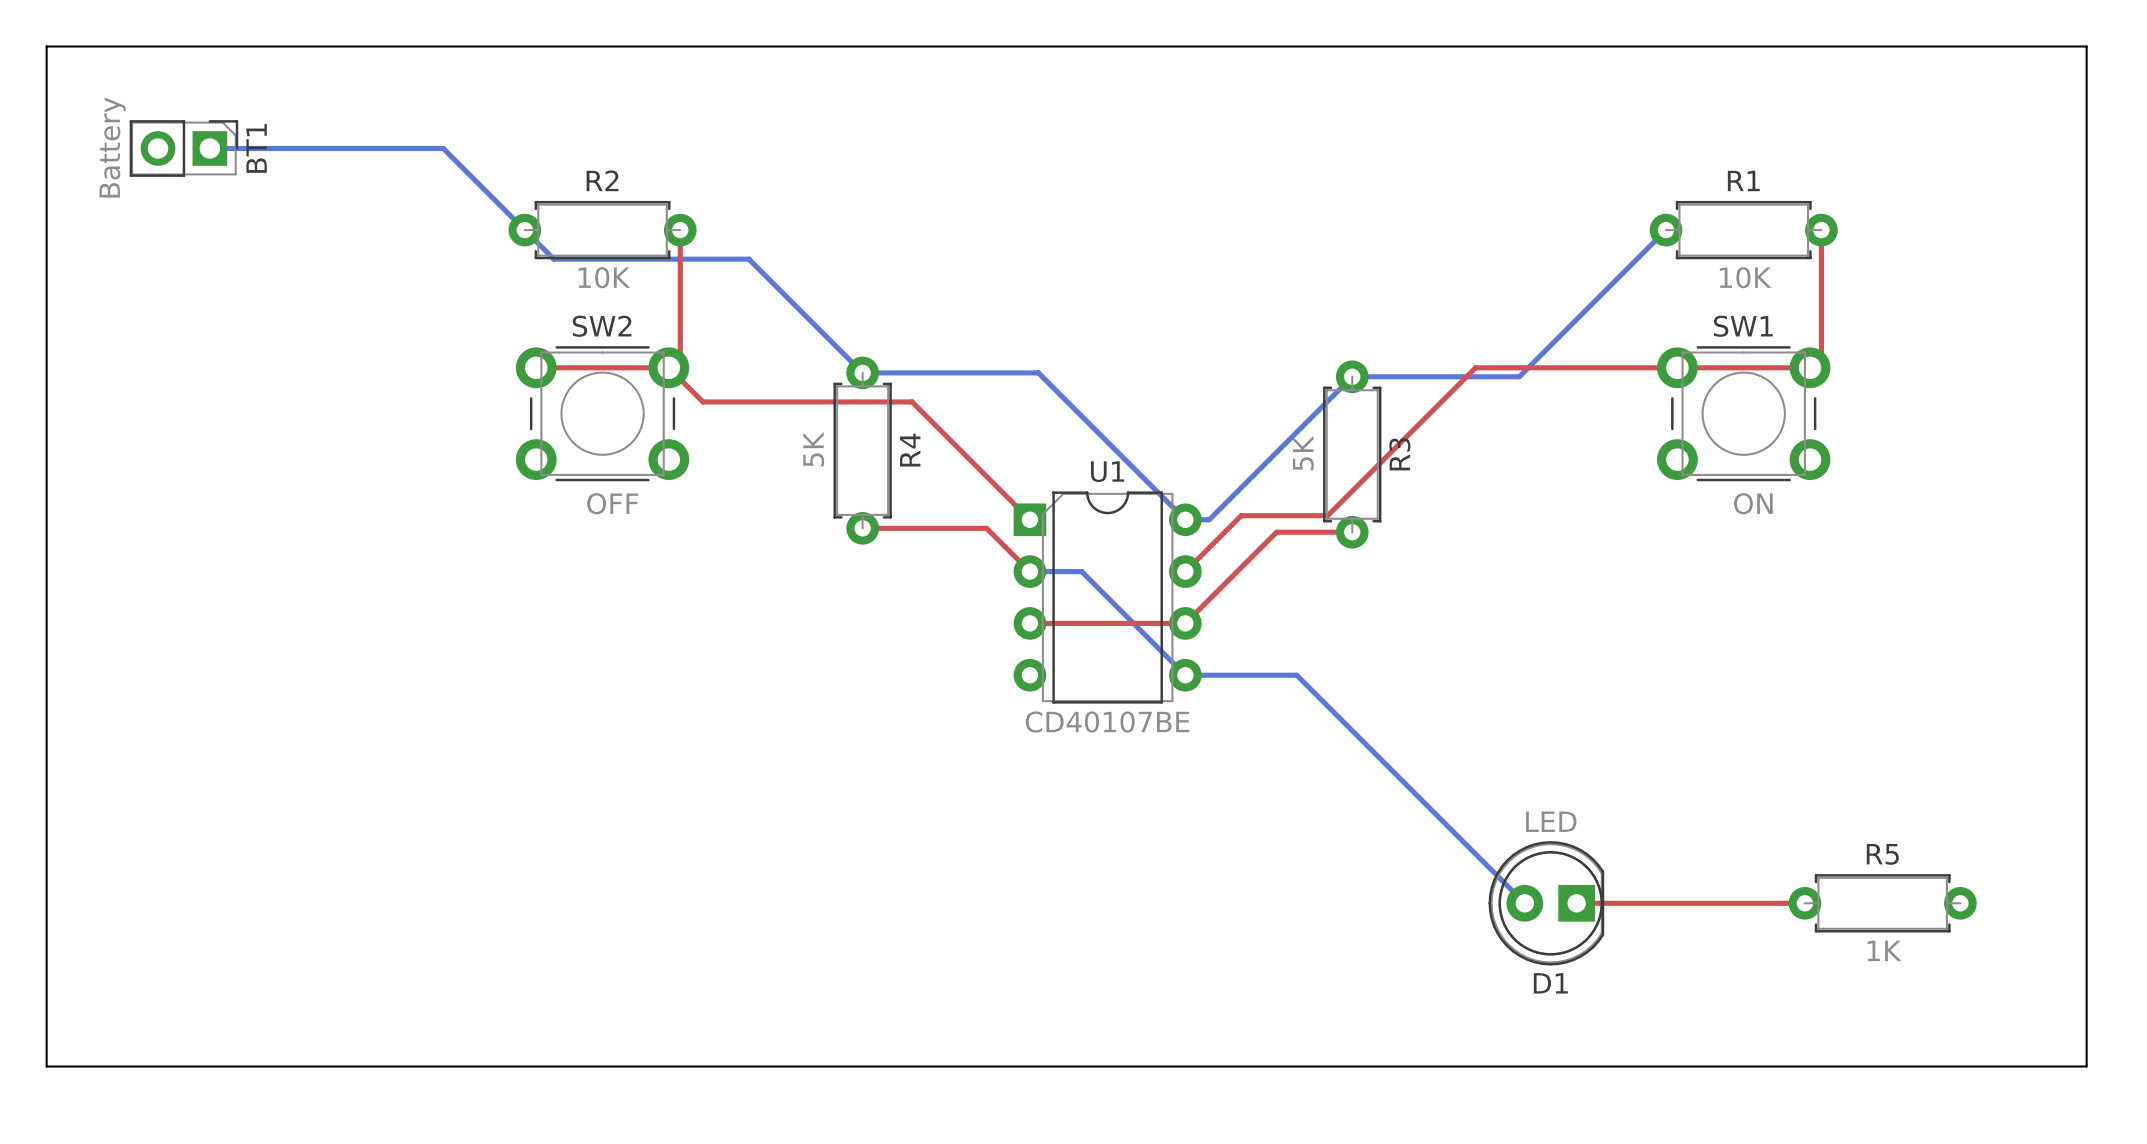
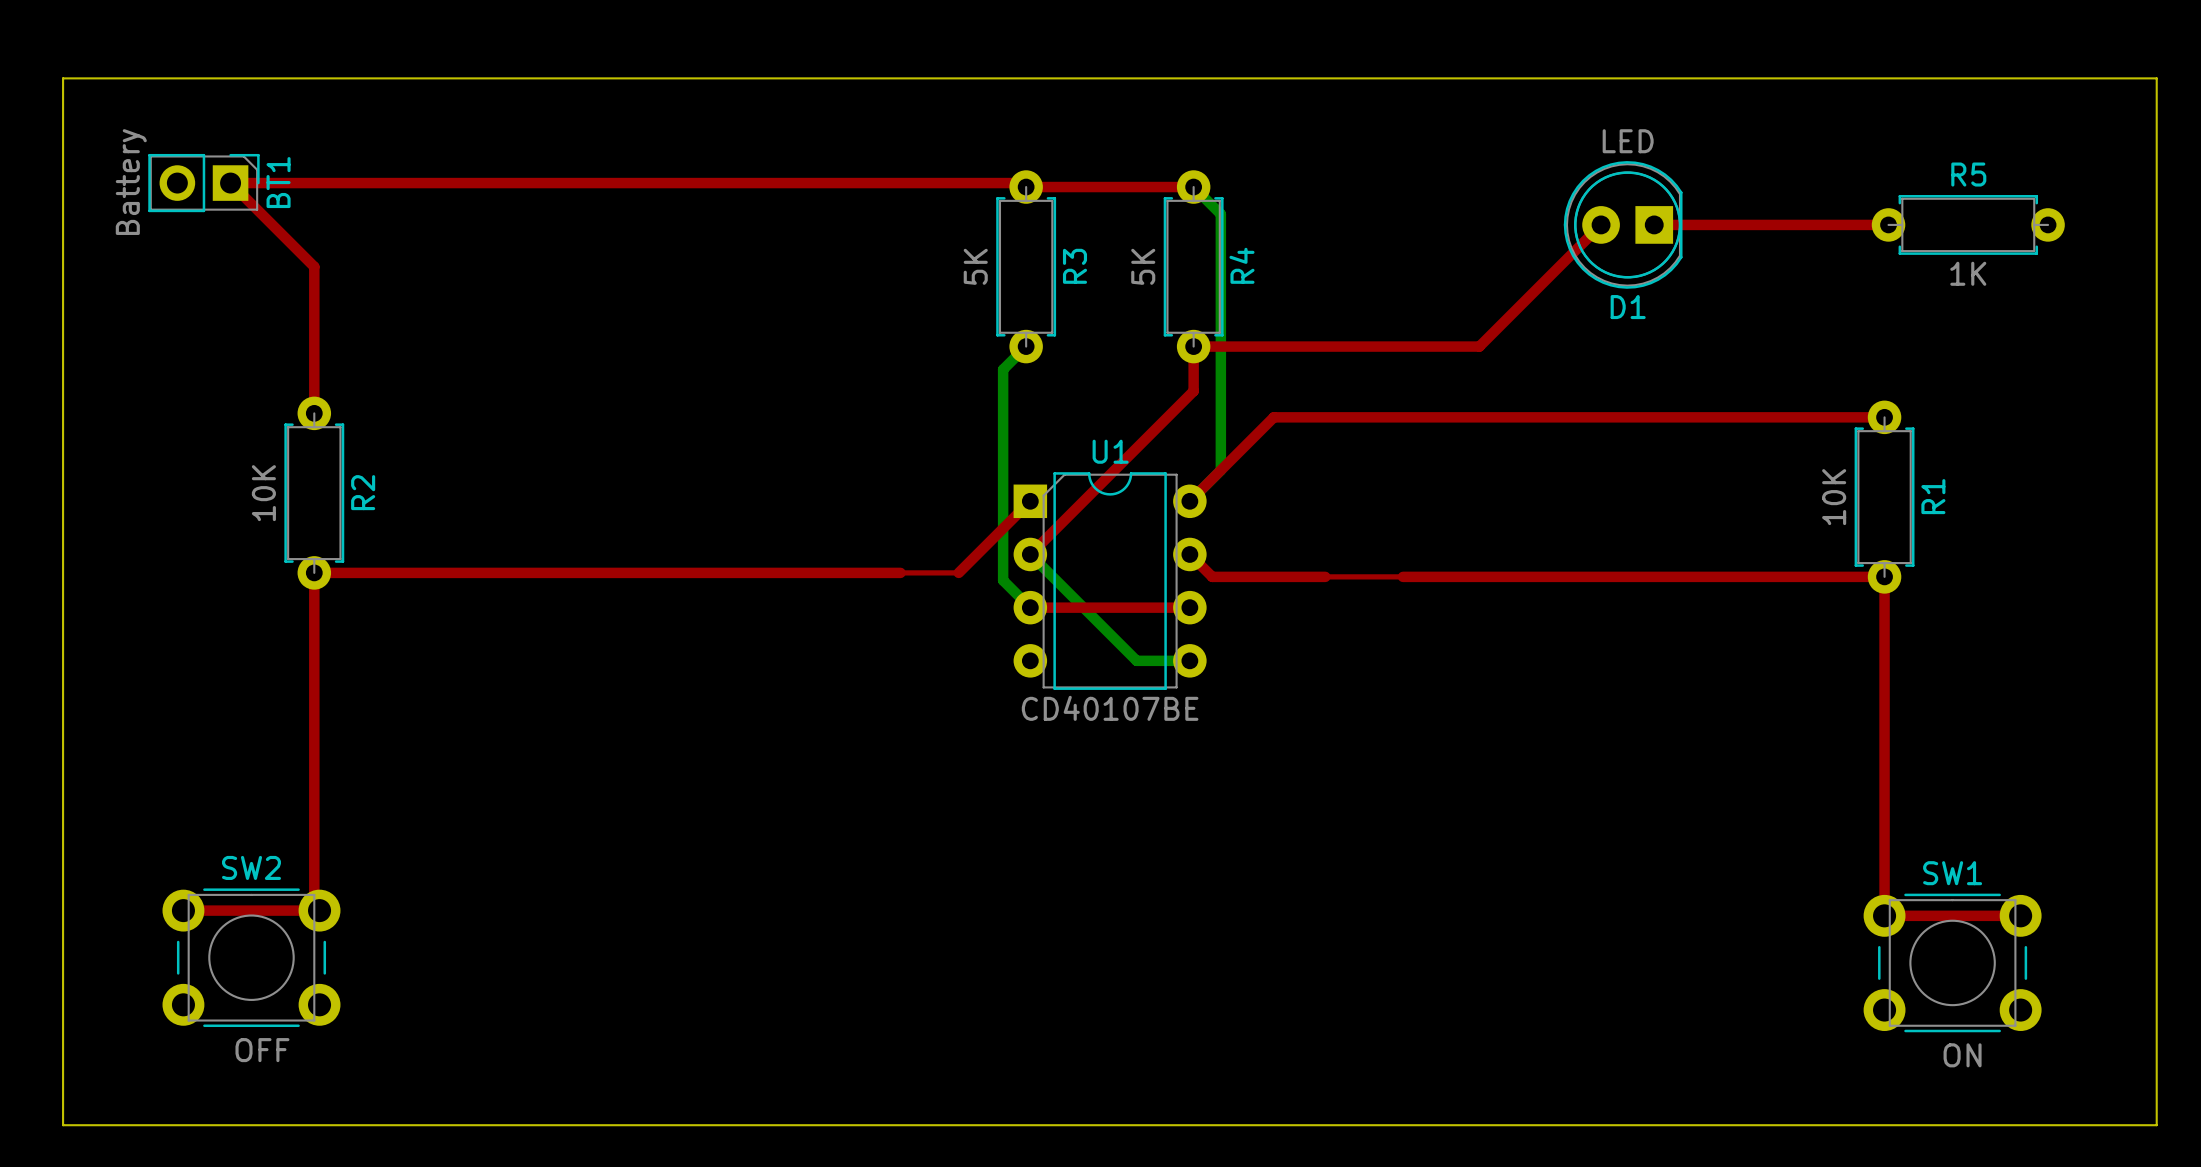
bottom track: (209, 148) (443, 148) (553, 259) (748, 259) (862, 372) (1038, 372) (1185, 519) (1209, 519) (1352, 376) (1519, 376) (1666, 230) -> none
bottom track: none -> (1193, 187) (1220, 214) (1220, 470) (1189, 501)
top track: none -> (1193, 187) (1026, 187) (1022, 183) (230, 183) (314, 266) (314, 413)
top track: none -> (1601, 224) (1479, 346) (1193, 346) (1193, 391) (1030, 554)
top track: none -> (1654, 224) (1888, 224)
R2 rotation: 0° (602, 230) -> 90° clockwise (314, 493)
R2 position: (602, 230) -> (314, 493)
top track: (680, 230) (680, 356) (668, 367) -> none
R1 rotation: 0° (1743, 230) -> 90° clockwise (1884, 497)
R1 position: (1743, 230) -> (1884, 497)
top track: (1821, 230) (1821, 356) (1810, 367) (1475, 367) (1327, 515) (1241, 515) (1185, 571) -> none
bottom track: none -> (1026, 346) (1003, 369) (1003, 580) (1030, 607)
top track: (536, 367) (668, 367) -> none
top track: (668, 367) (703, 401) (912, 401) (1029, 519) -> none
top track: none -> (1884, 417) (1273, 417) (1189, 501)
SW2 position: (602, 413) -> (251, 957)
SW1 position: (1743, 413) -> (1952, 962)
R4 position: (862, 450) -> (1193, 266)
R3 position: (1352, 454) -> (1026, 266)
bottom track: none -> (1030, 554) (1136, 660) (1189, 660)
top track: none -> (900, 572) (314, 572) (314, 905) (319, 910) (183, 910)
top track: (919, 528) (986, 528) (1029, 571) -> (958, 572) (1030, 501)
top track: (1276, 532) (1185, 623) (1029, 623) -> (1325, 576) (1212, 576) (1189, 554)
top track: none -> (1403, 576) (1884, 576) (1884, 915) (2020, 915)
top track: none -> (1030, 607) (1189, 607)
bottom track: (1029, 571) (1081, 571) (1185, 675) (1296, 675) (1524, 903) -> none
U1 position: (1107, 597) -> (1110, 581)
D1 position: (1546, 903) -> (1623, 224)
top track: (1576, 903) (1804, 903) -> none
R5 position: (1882, 903) -> (1968, 224)

